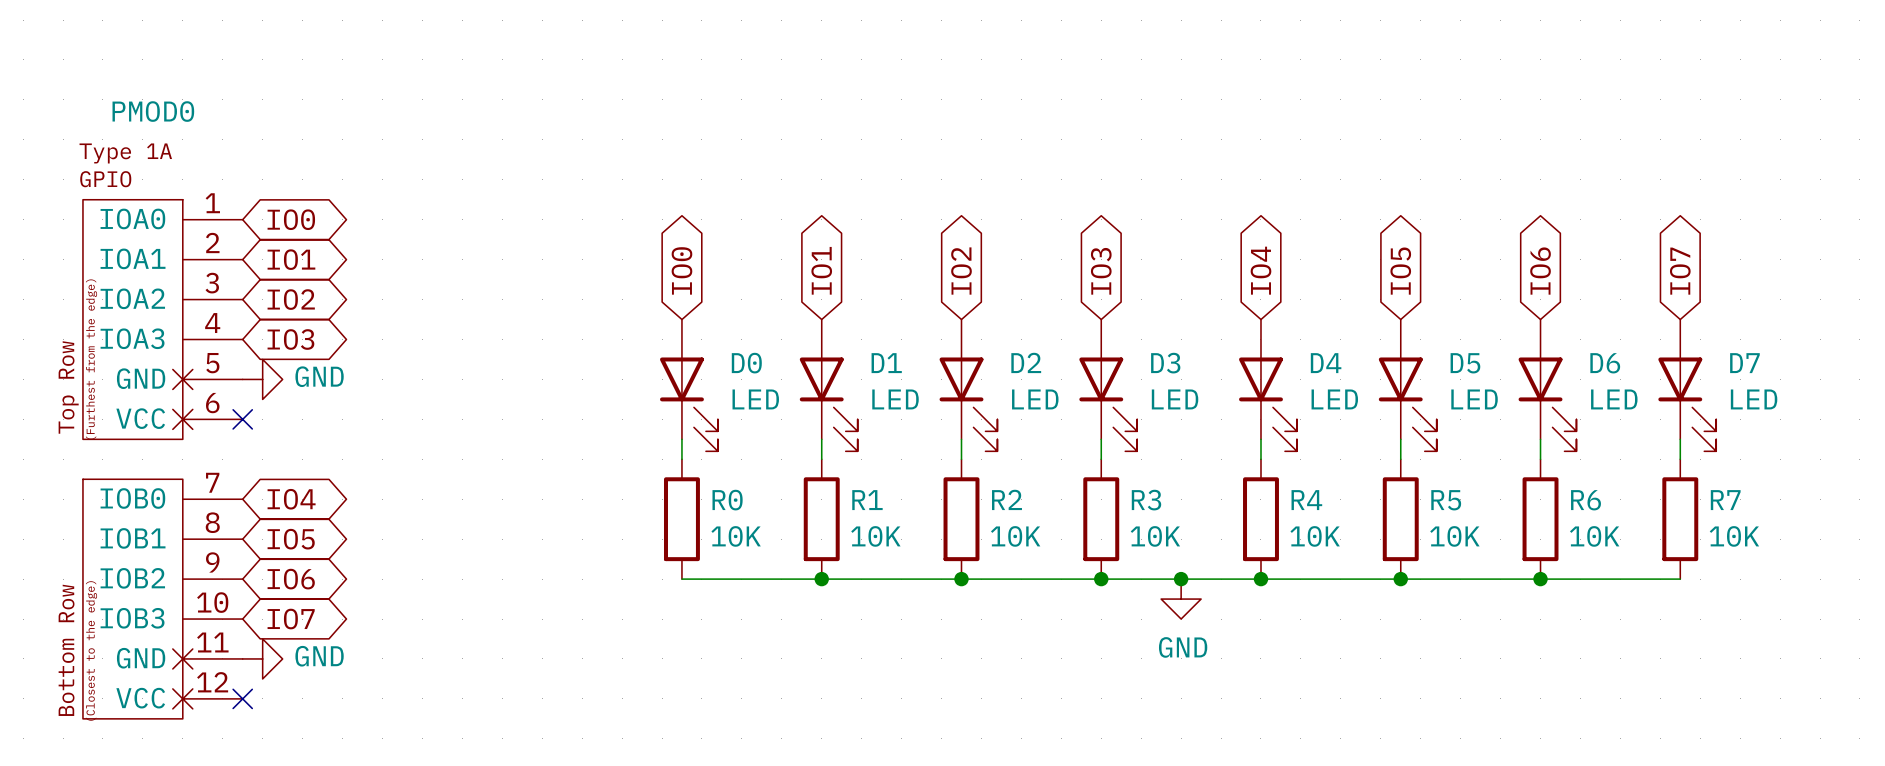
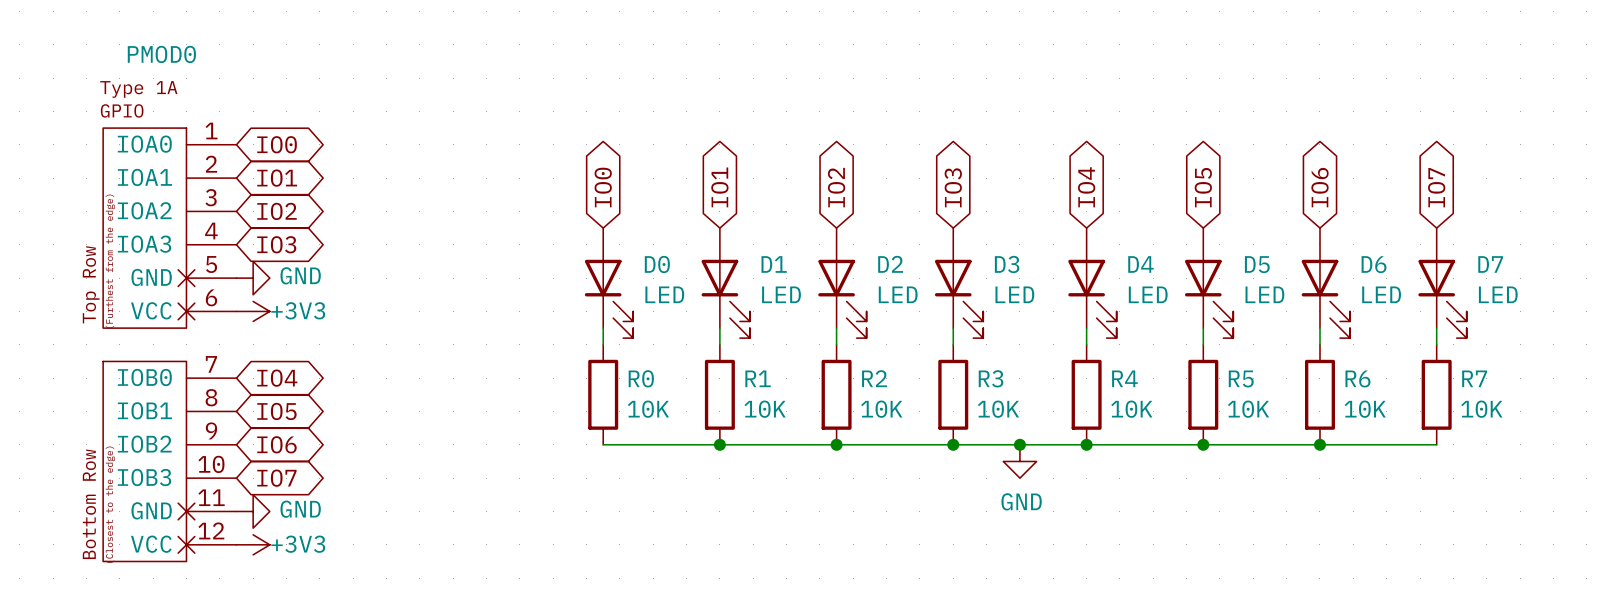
no-connect mark: (242, 419) -> none
power symbol: none -> +3V3 (253, 311)
no-connect mark: (242, 698) -> none
power symbol: none -> +3V3 (253, 544)

